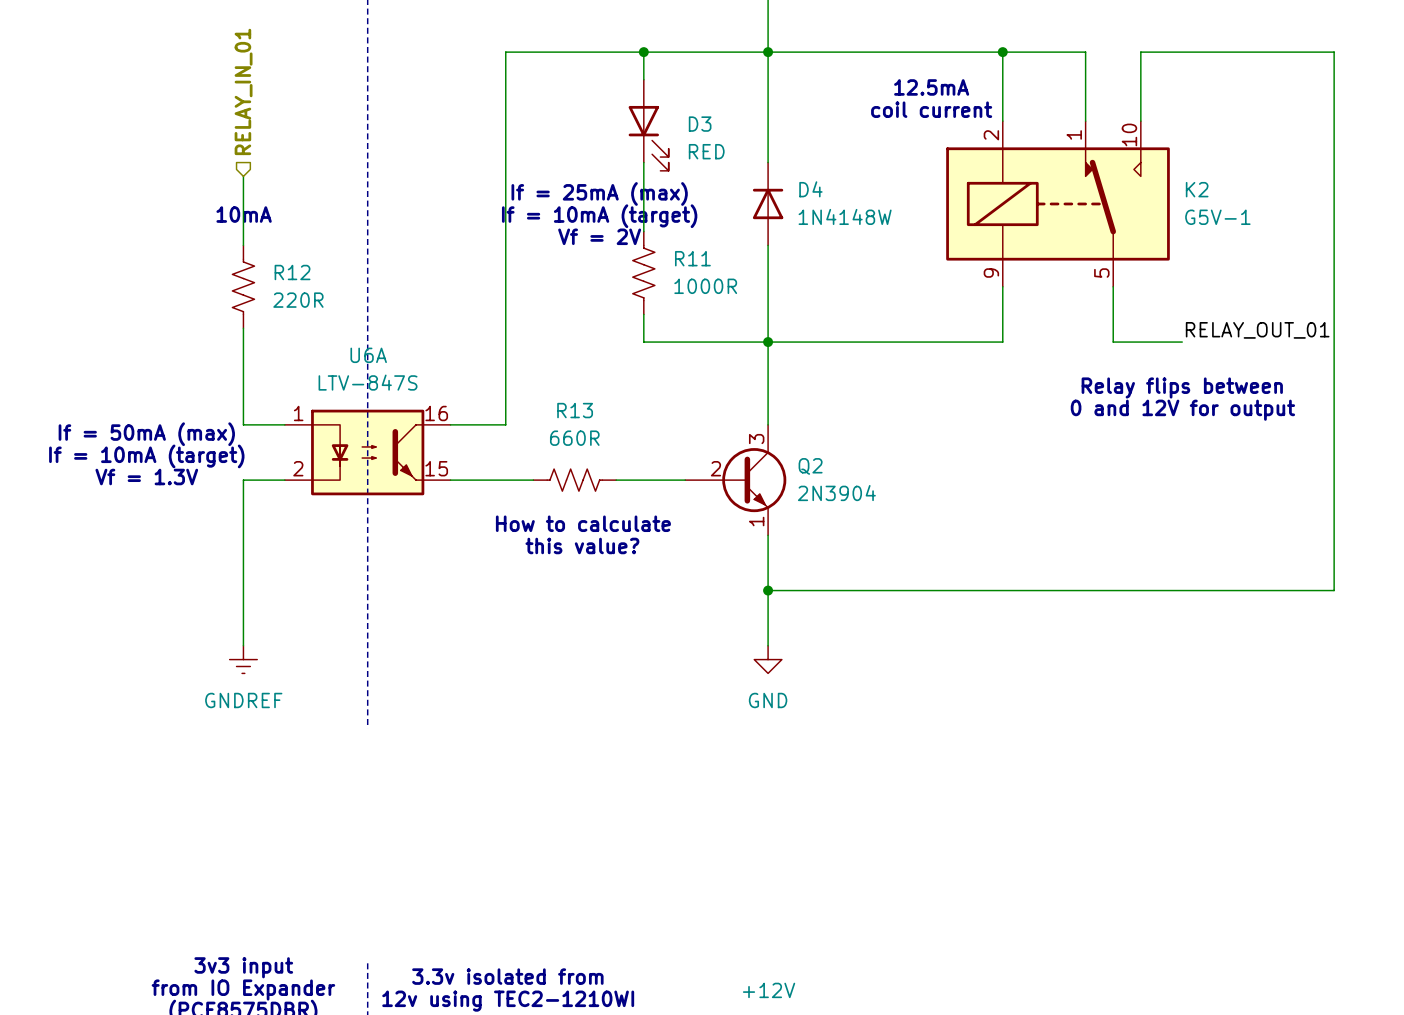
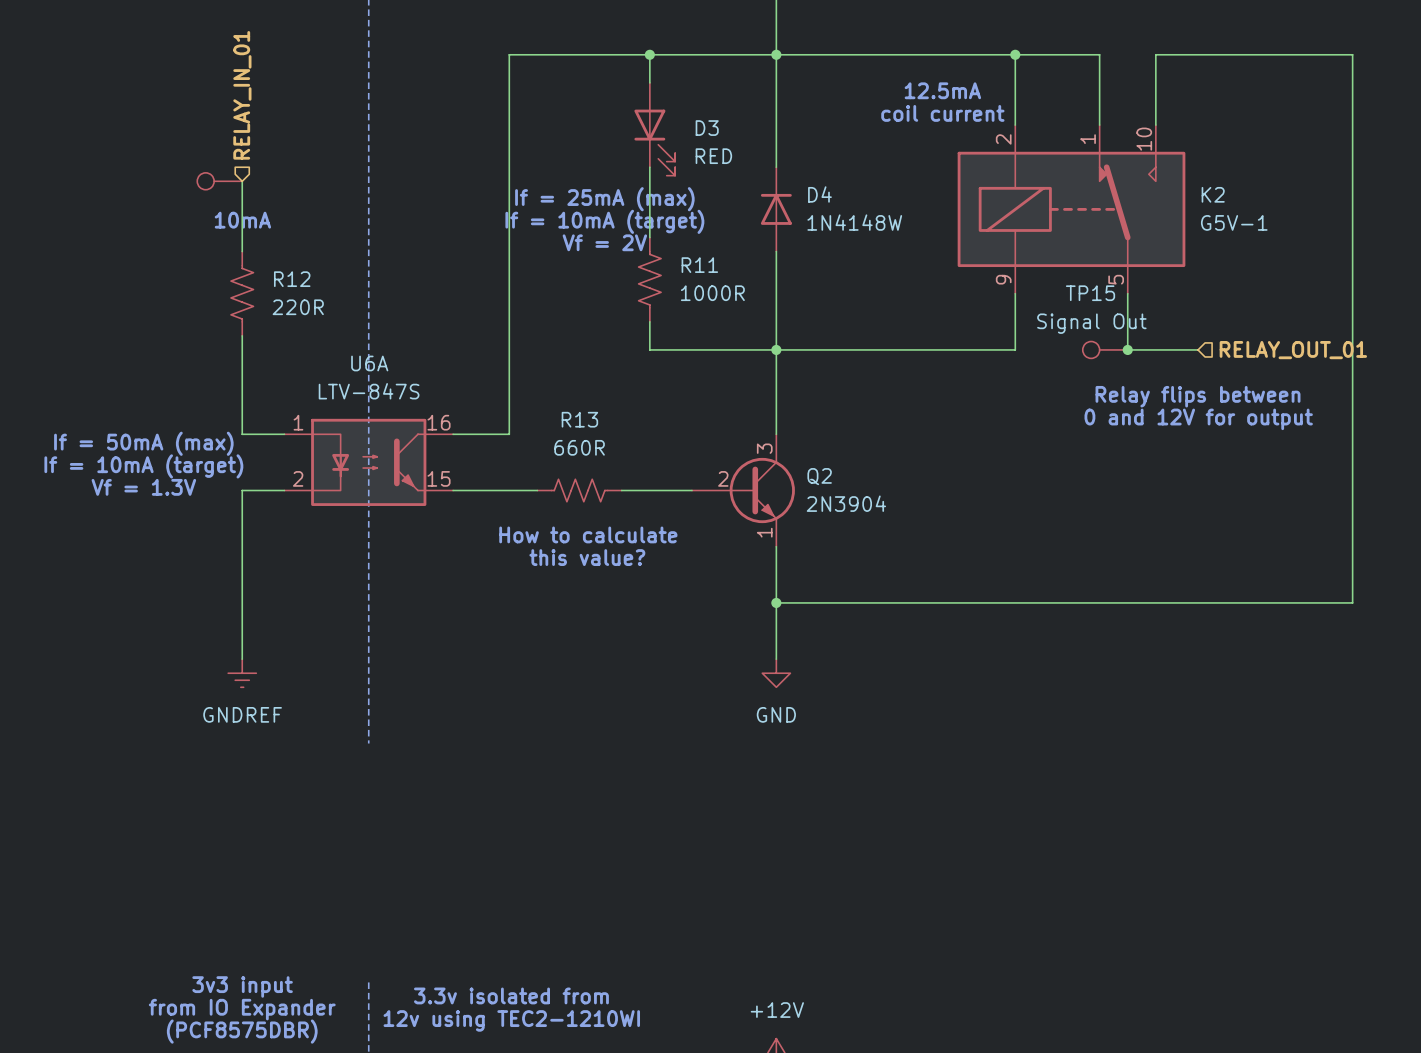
part: none -> (219, 181)
label: RELAY_OUT_01 (1257, 330) -> none
TP15: none -> Signal Out (1105, 349)
junction: none -> (1127, 349)
hierarchical label: none -> RELAY_OUT_01 (1293, 350)

